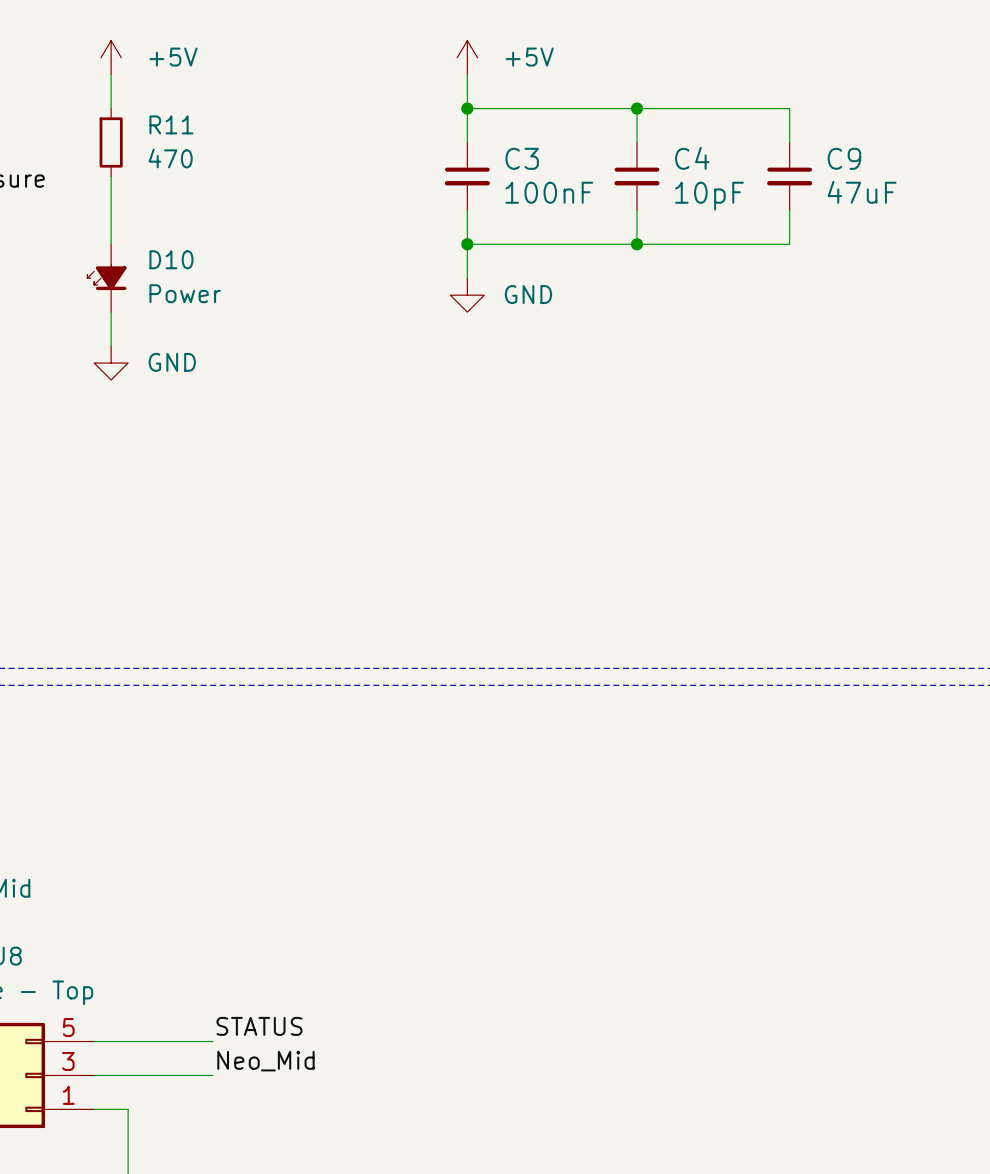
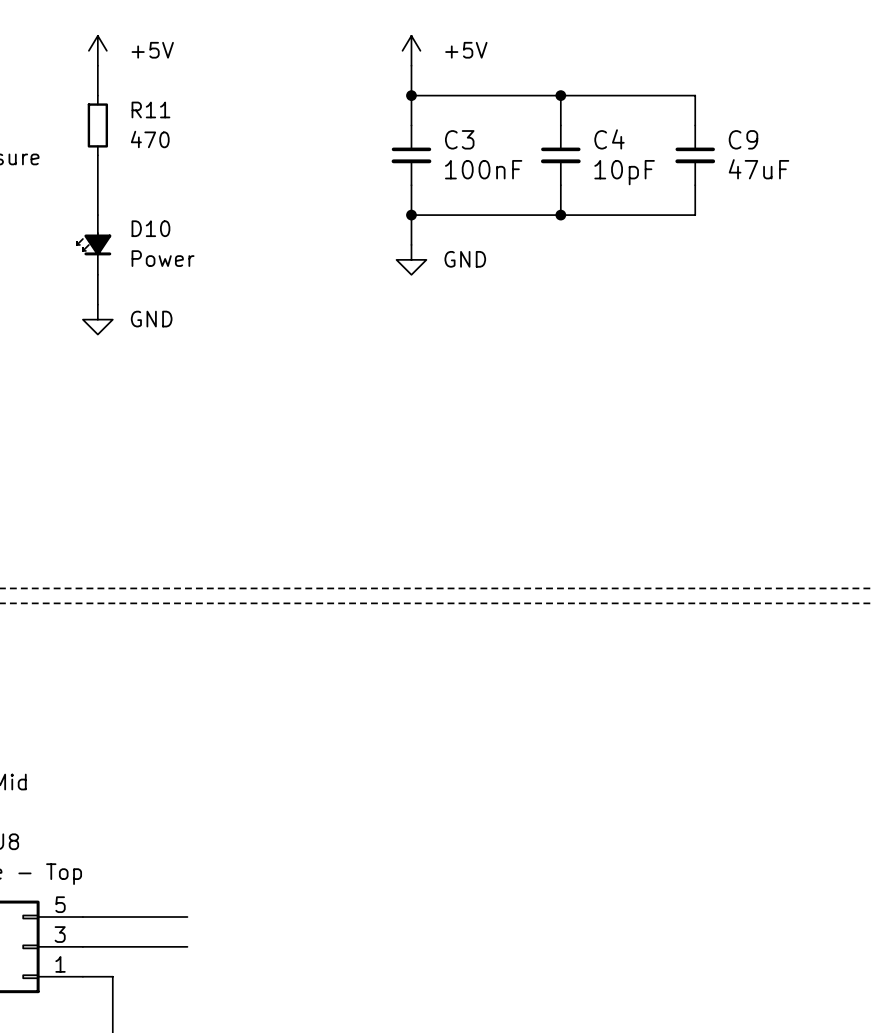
label: STATUS (259, 1026) -> none
label: Neo_Mid (265, 1061) -> none

